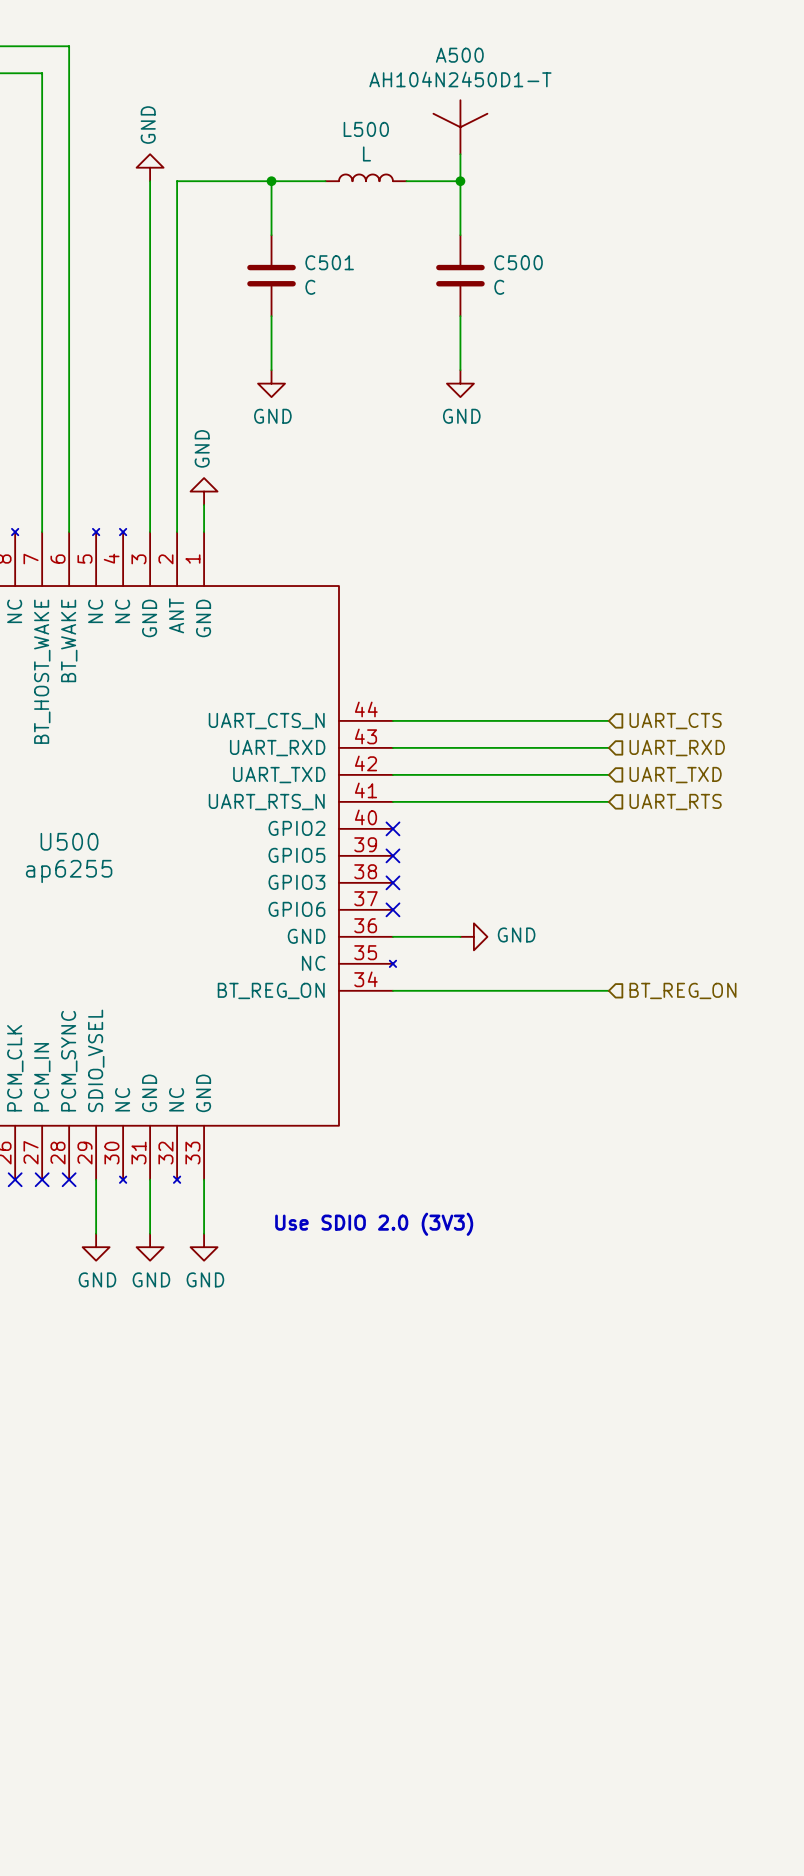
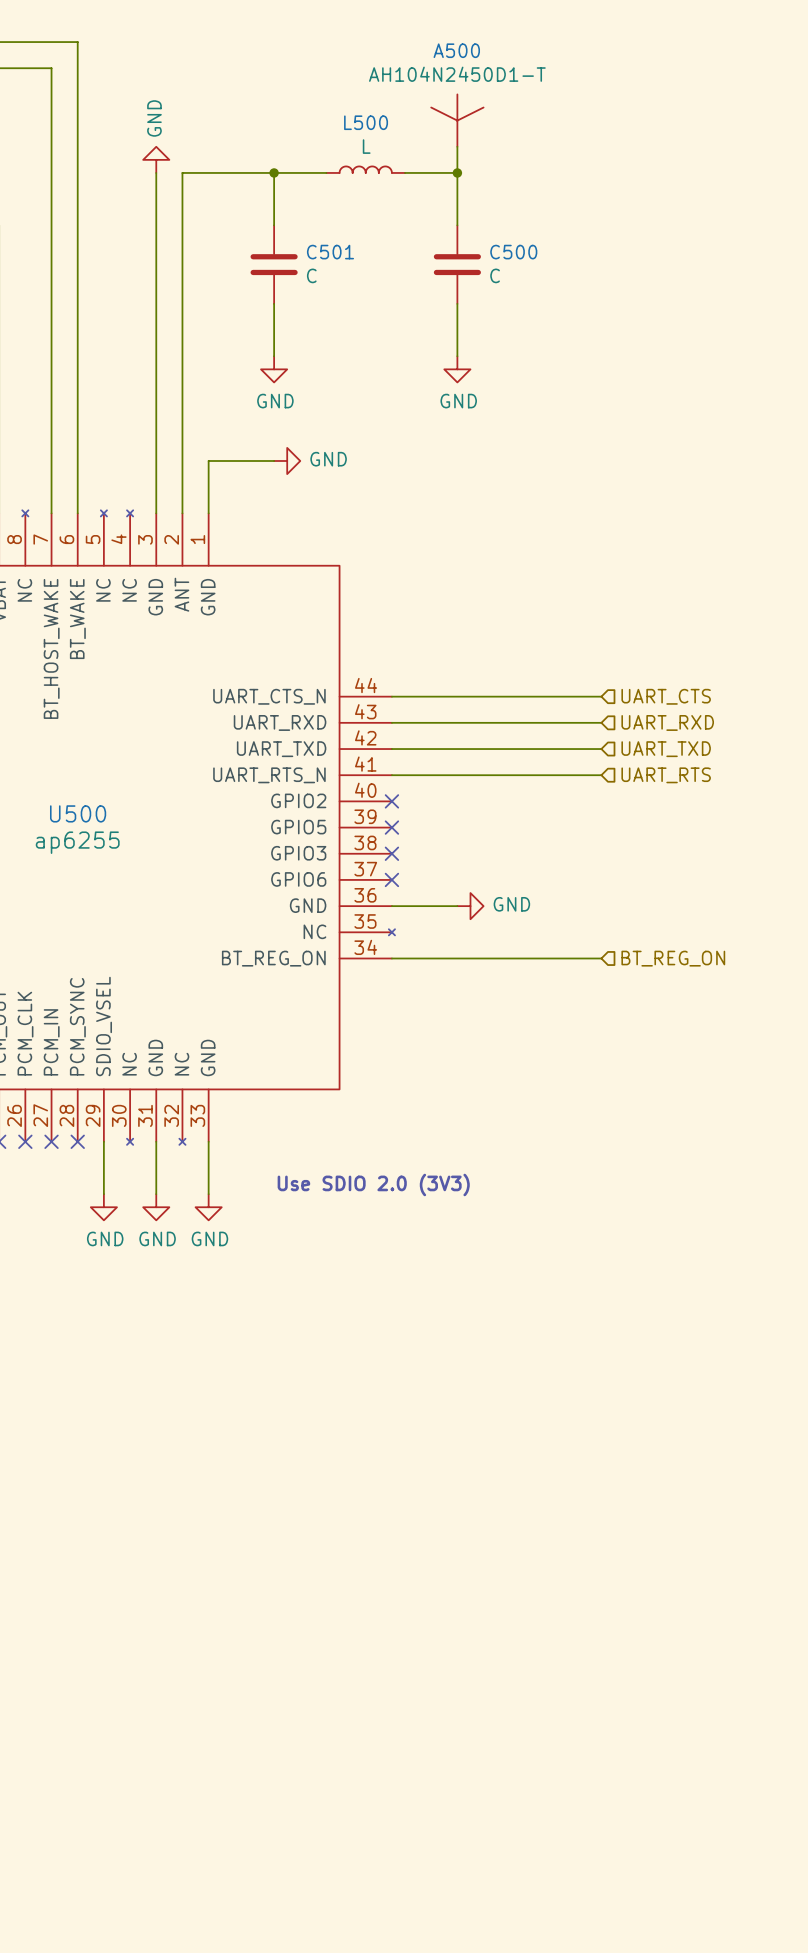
wire: none -> (274, 460) (208, 460) (208, 487)
power symbol rotation: 0° (204, 491) -> 90° clockwise (287, 460)
power symbol position: GND (204, 491) -> GND (287, 460)

